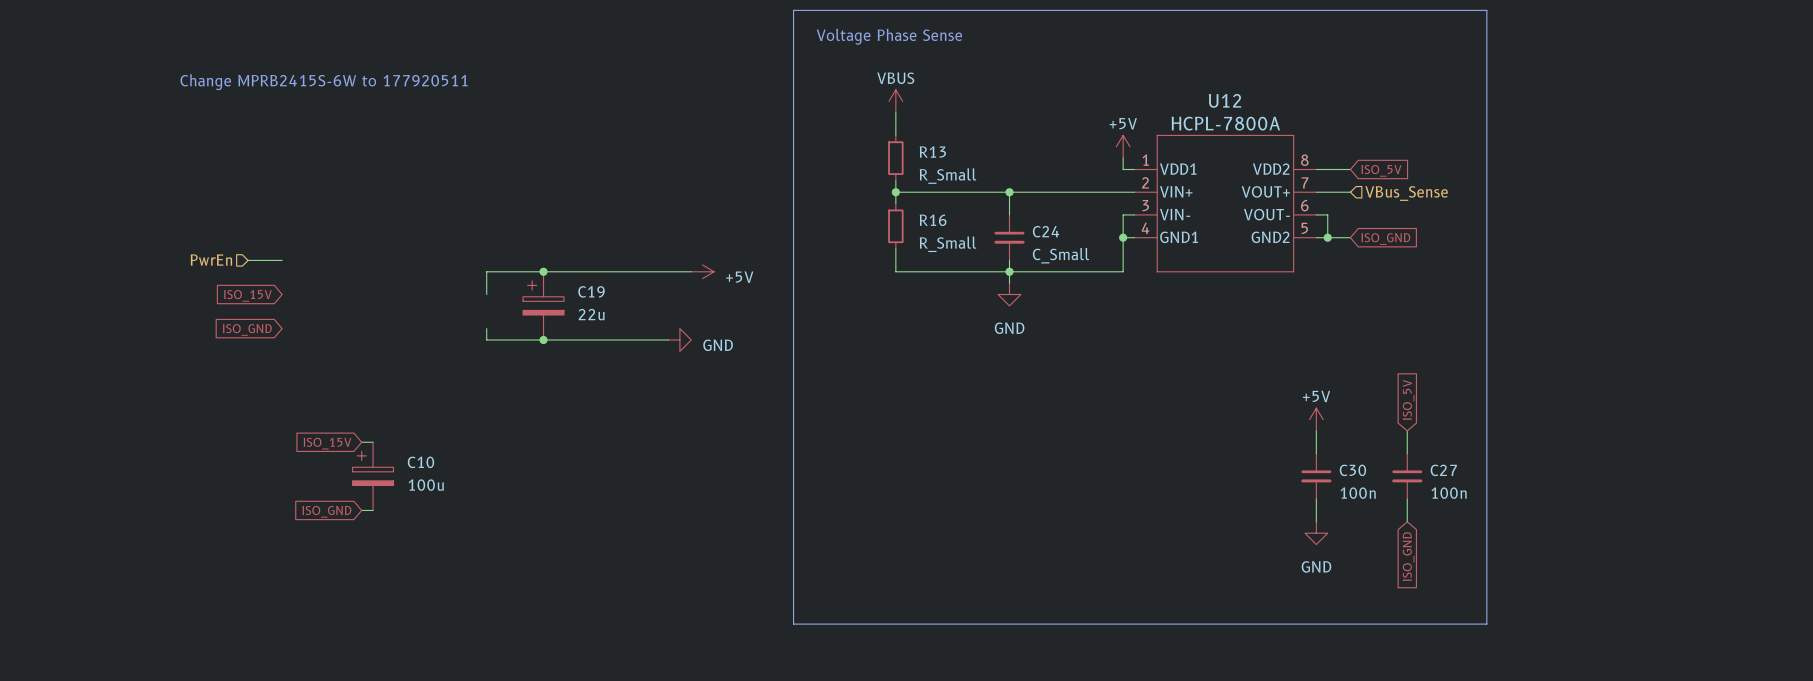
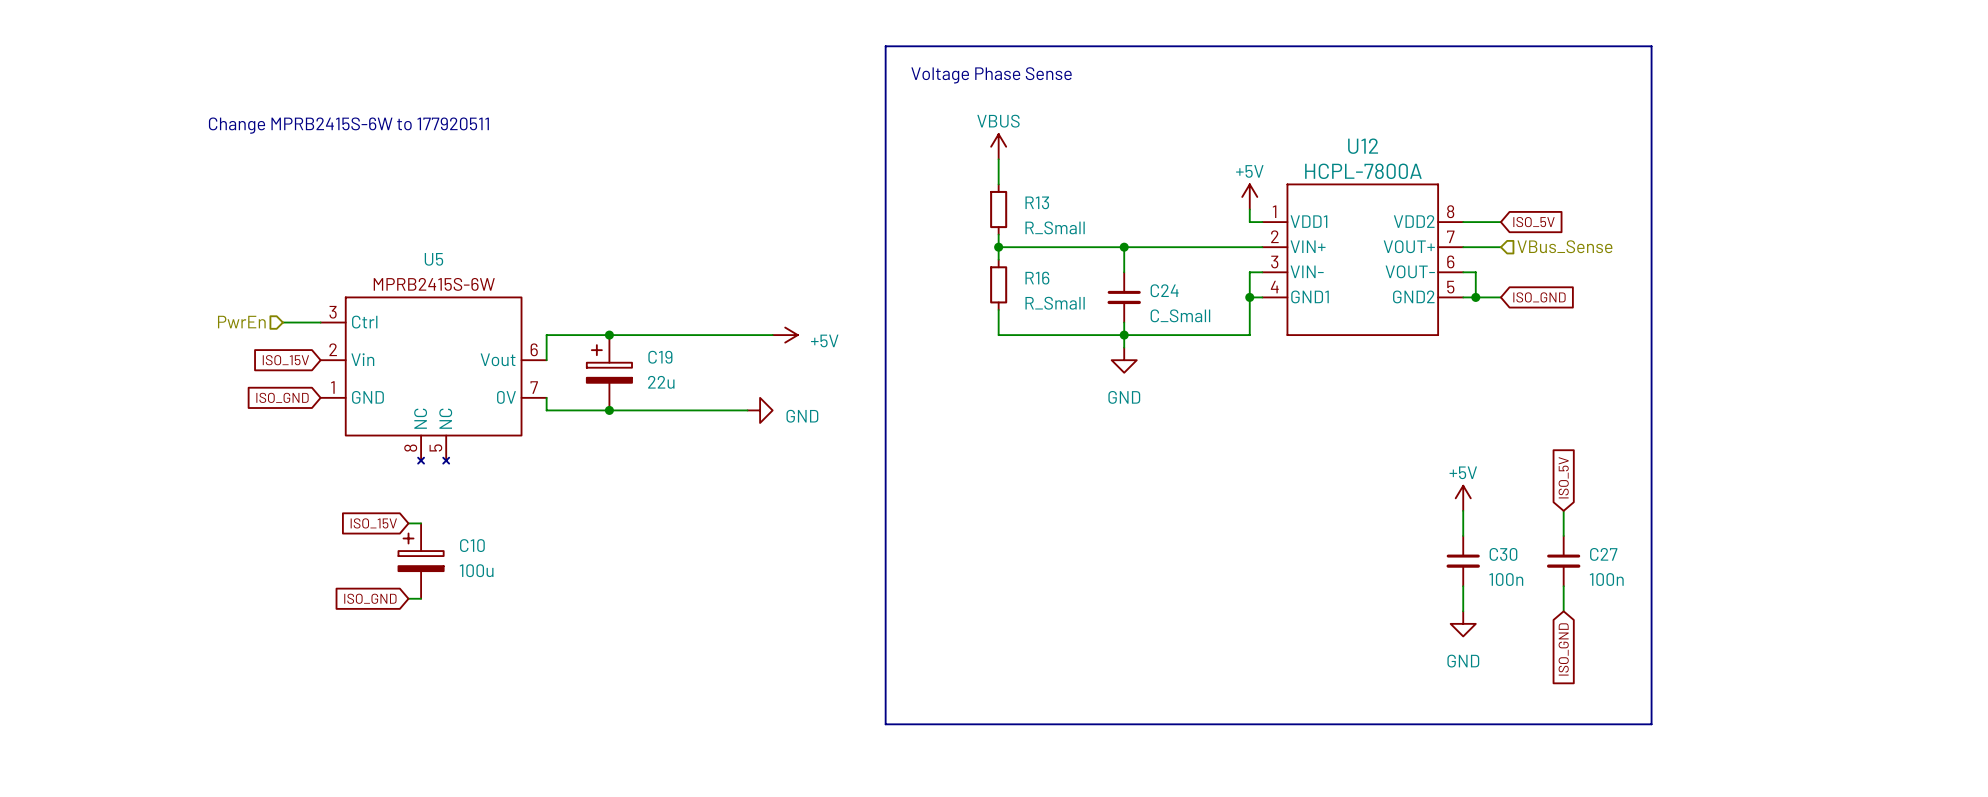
U5: none -> (433, 380)

